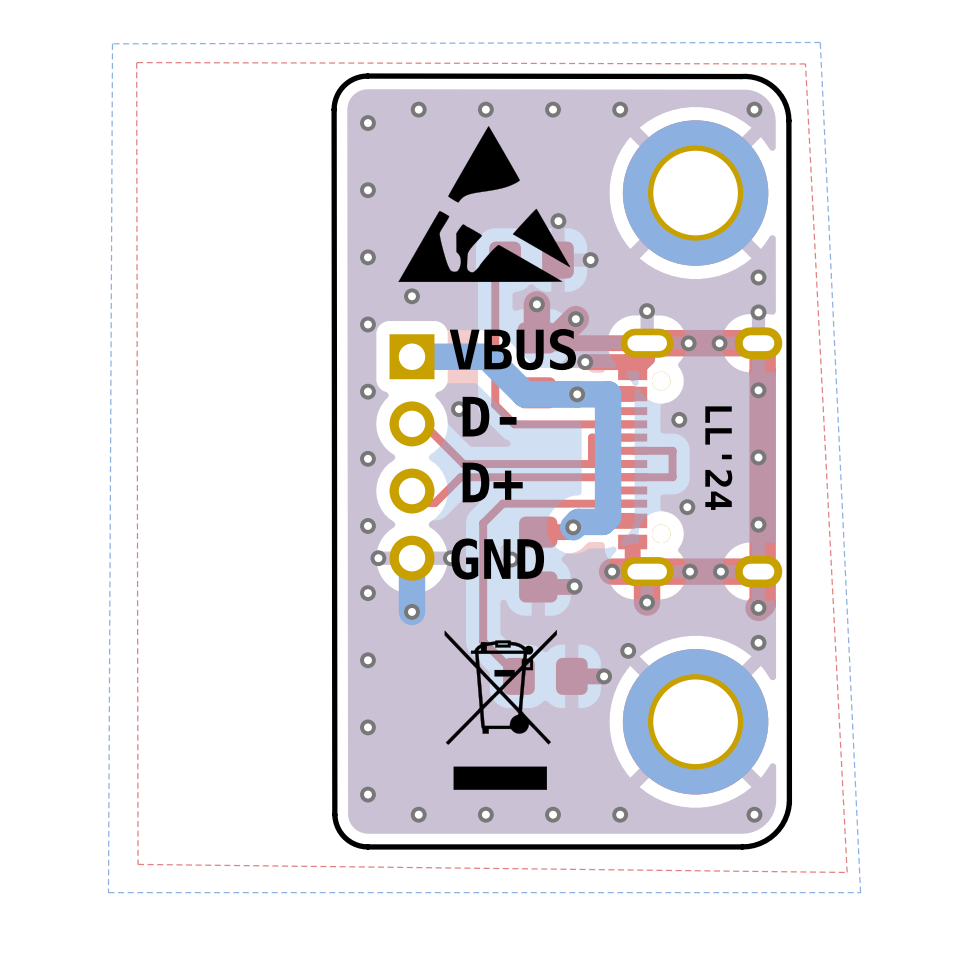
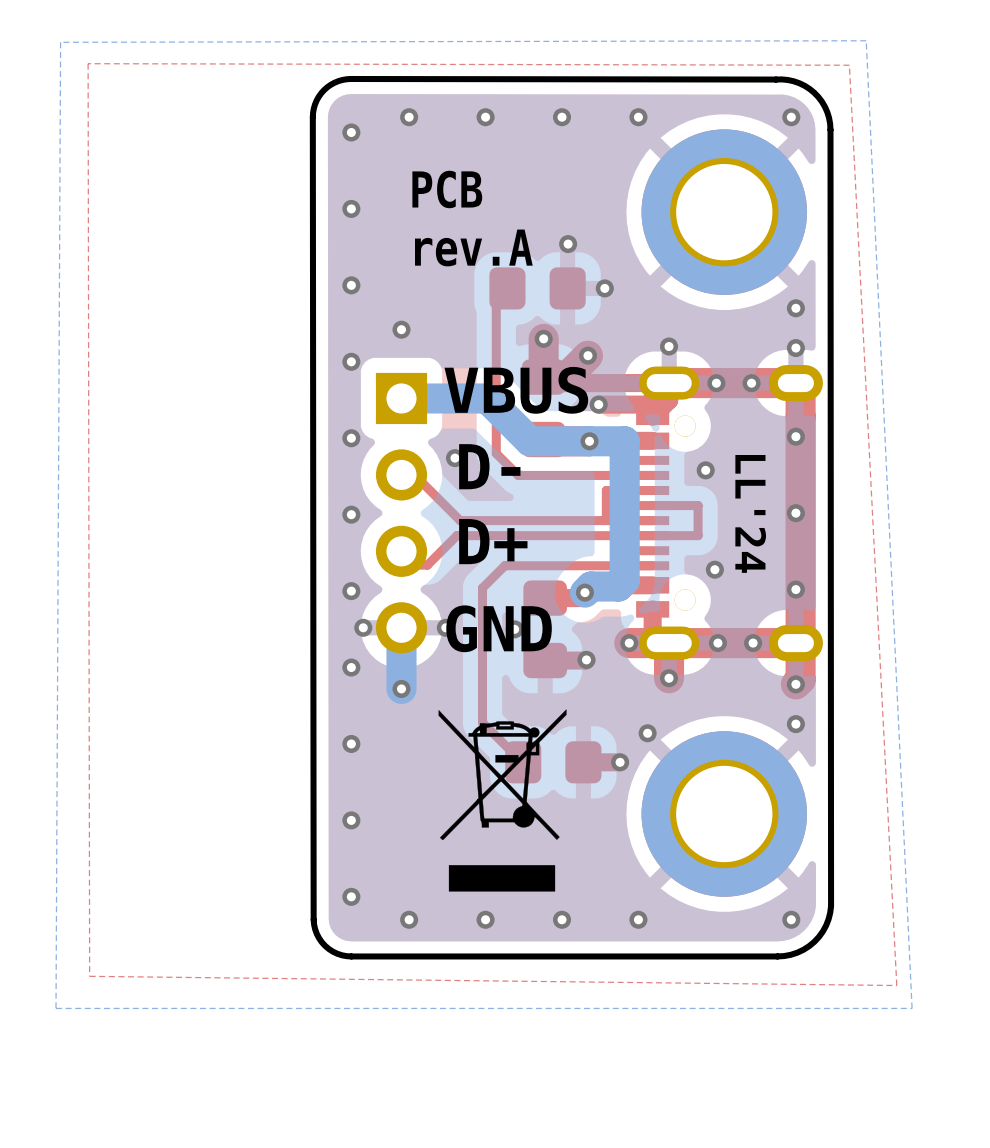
drawing: [398, 126, 571, 282] -> none
text: none -> PCB (447, 189)
text: none -> rev.A (473, 247)

